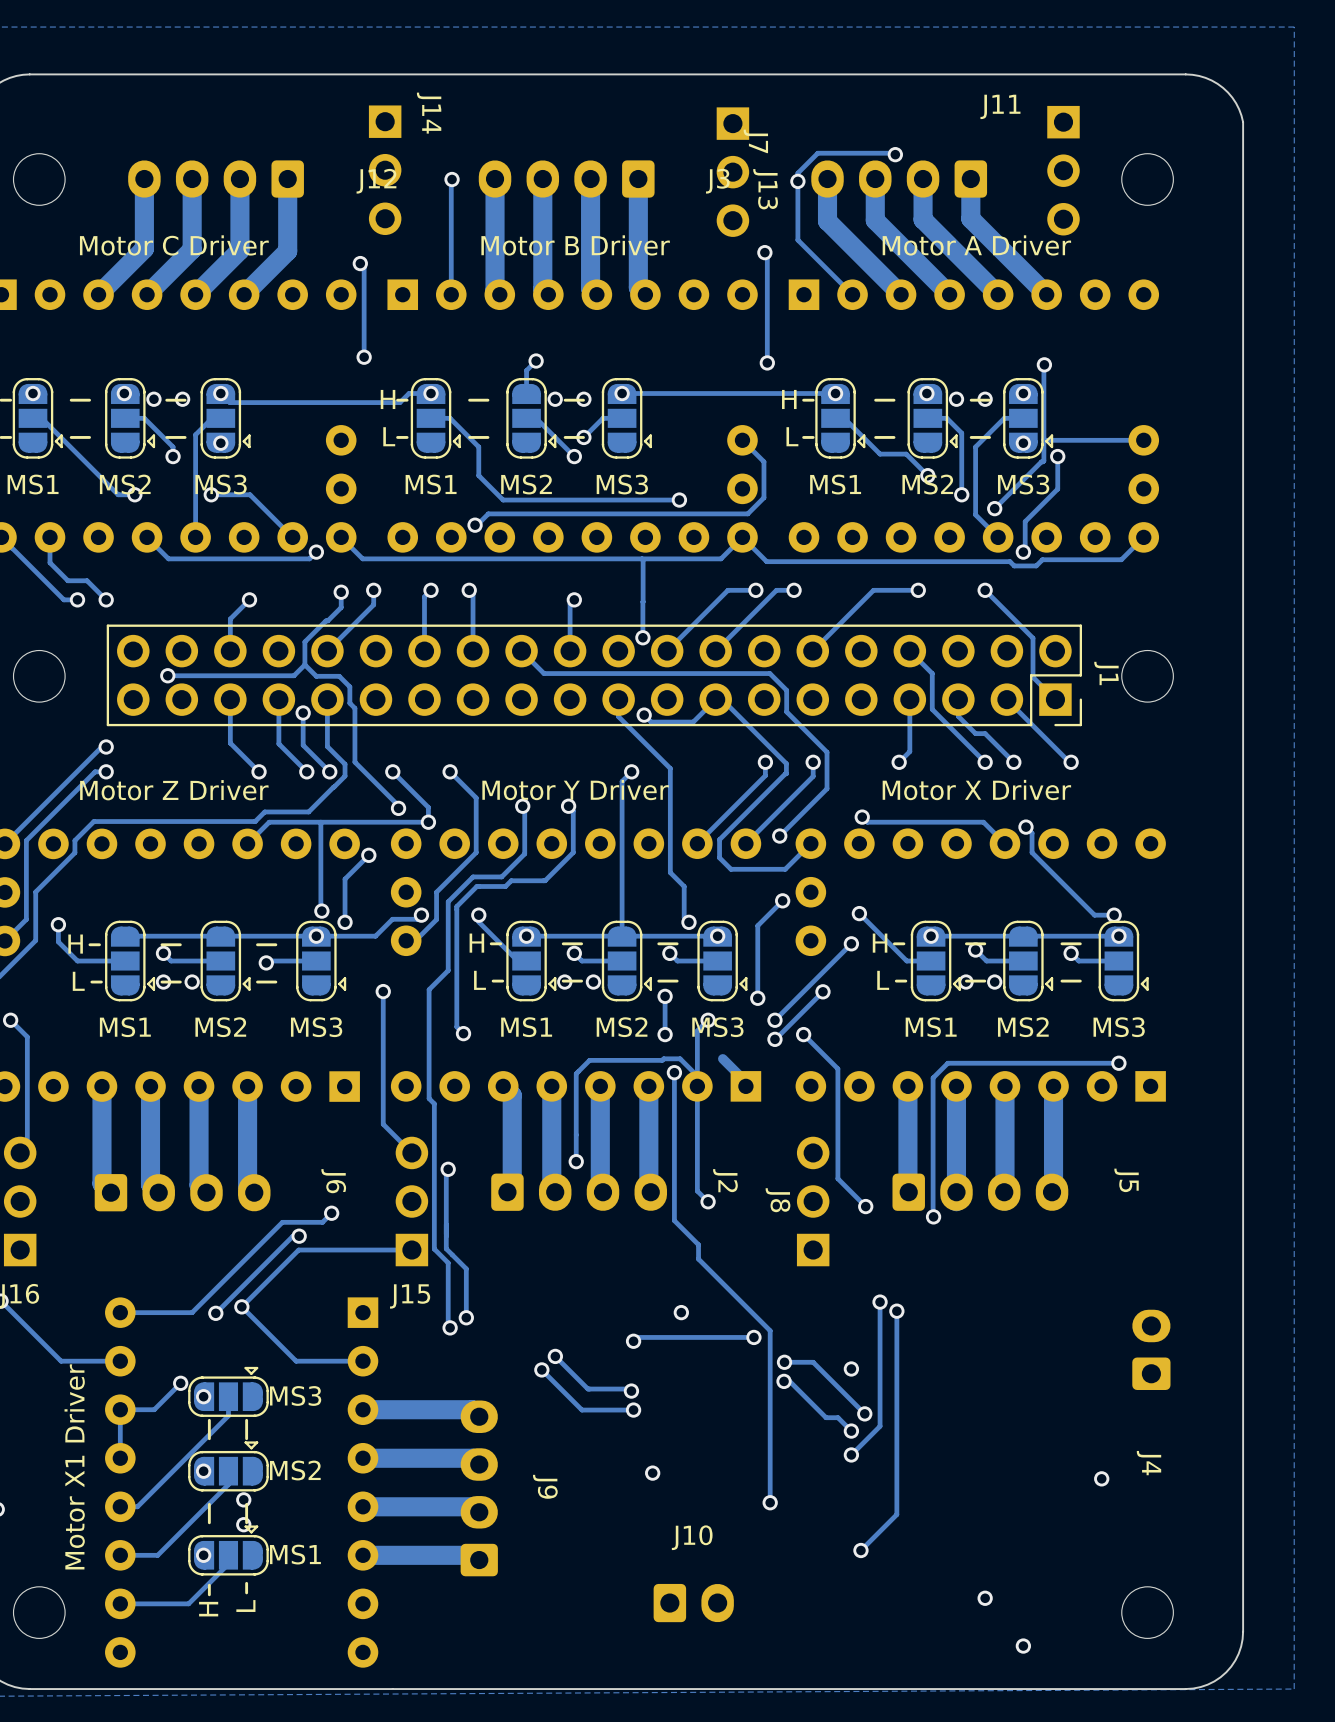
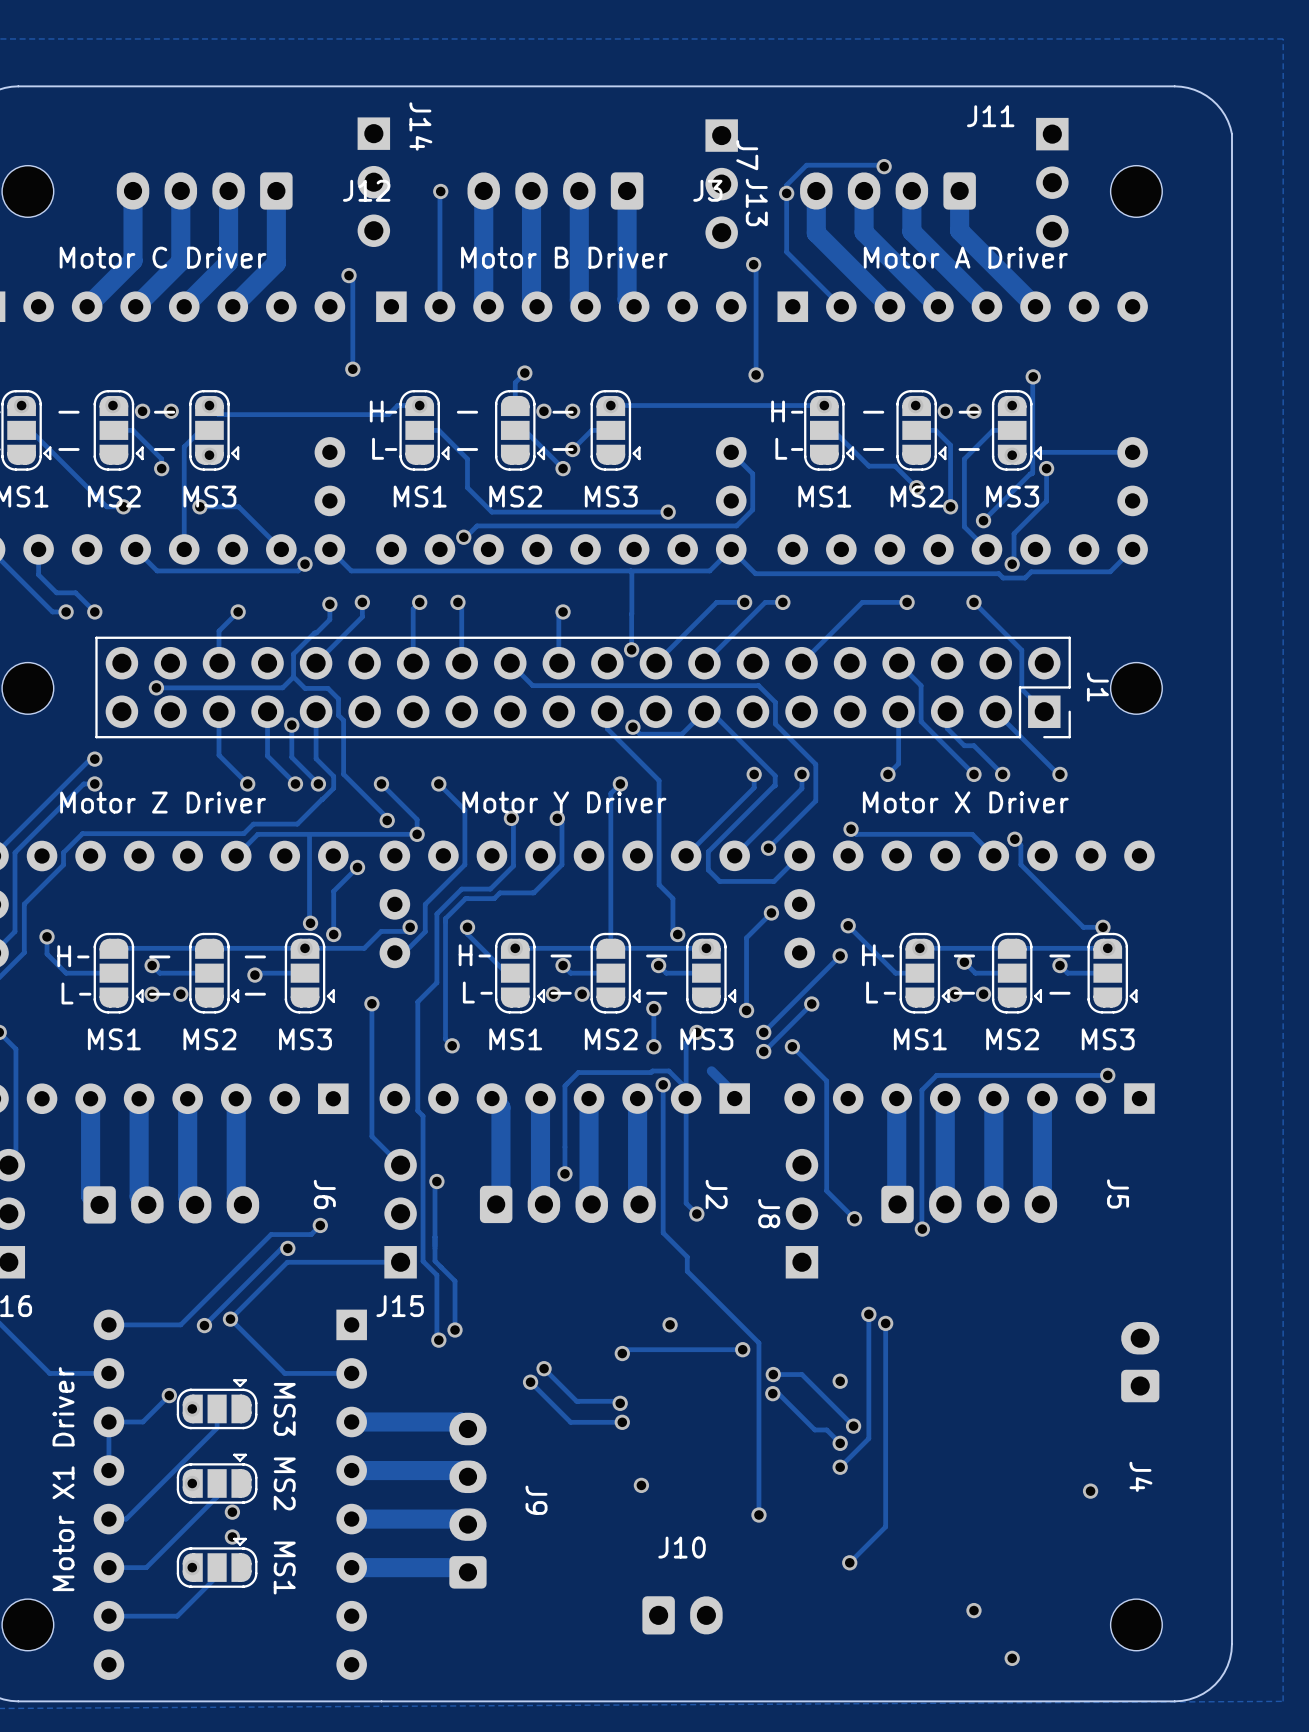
part value rotation: 0° (295, 1395) -> 90° clockwise (284, 1409)
line: (209, 1420) (209, 1438) -> none
line: (246, 1420) (246, 1438) -> none
part value rotation: 0° (295, 1470) -> 90° clockwise (284, 1483)
line: (209, 1504) (209, 1522) -> none
line: (246, 1504) (246, 1522) -> none
part value rotation: 0° (295, 1554) -> 90° clockwise (284, 1568)
line: (246, 1583) (246, 1592) -> none
line: (209, 1585) (209, 1594) -> none
text: L (245, 1606) -> none
text: H (208, 1609) -> none

